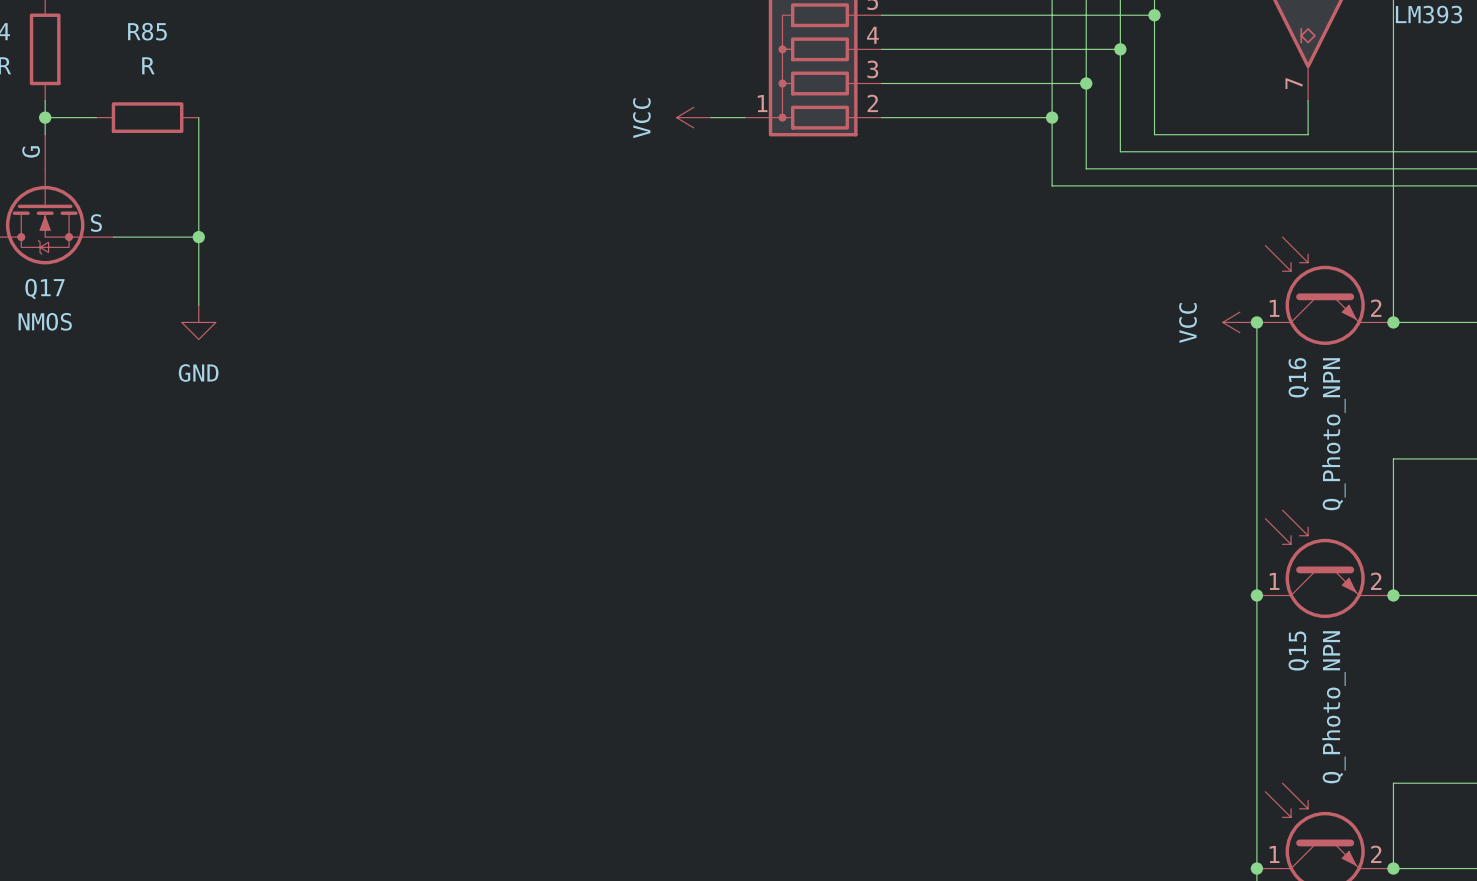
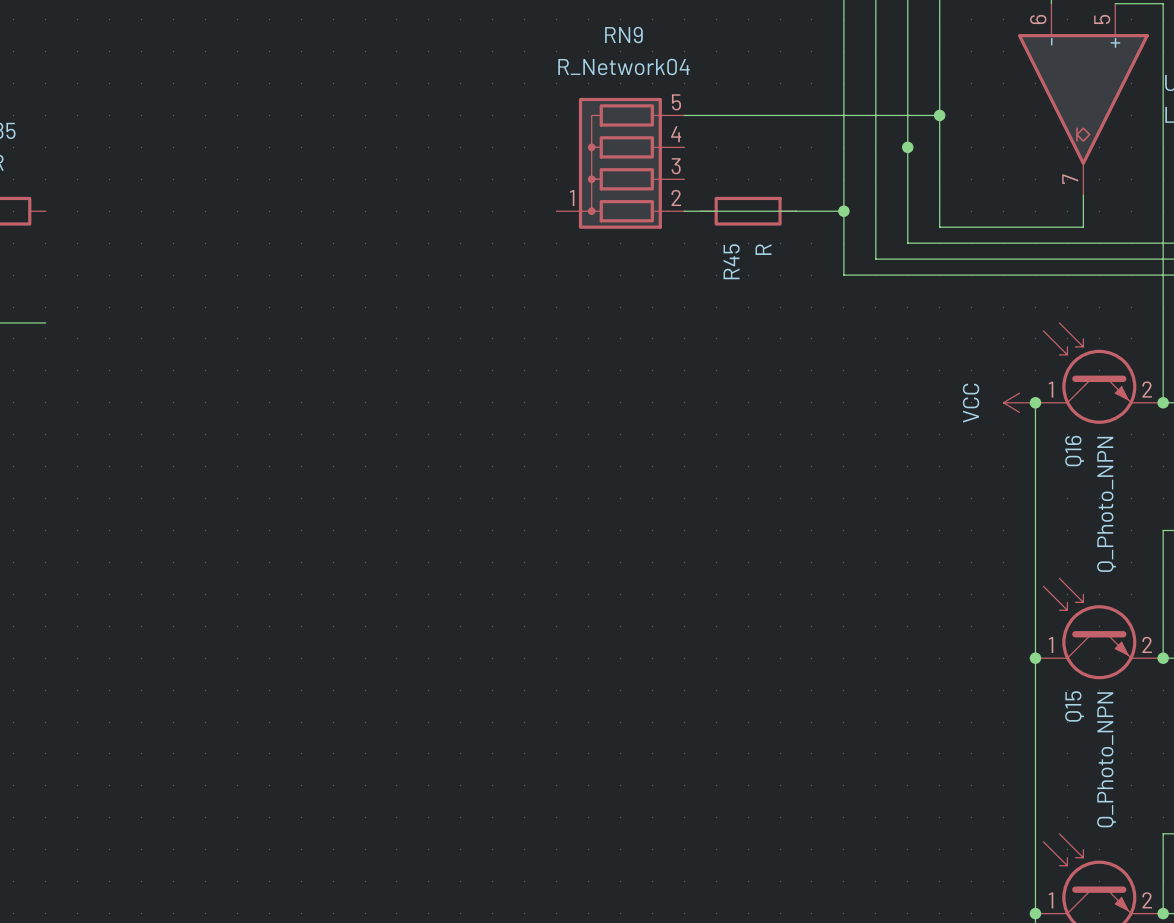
wire: (881, 49) (1120, 49) -> none
wire: (881, 83) (1086, 83) -> none
junction: (1086, 83) -> none
wire: (198, 117) (198, 305) -> none
power symbol: VCC (693, 117) -> none
wire: (710, 117) (744, 117) -> none
R45: none -> R (748, 211)
junction: (198, 237) -> none
power symbol: GND (198, 322) -> none

